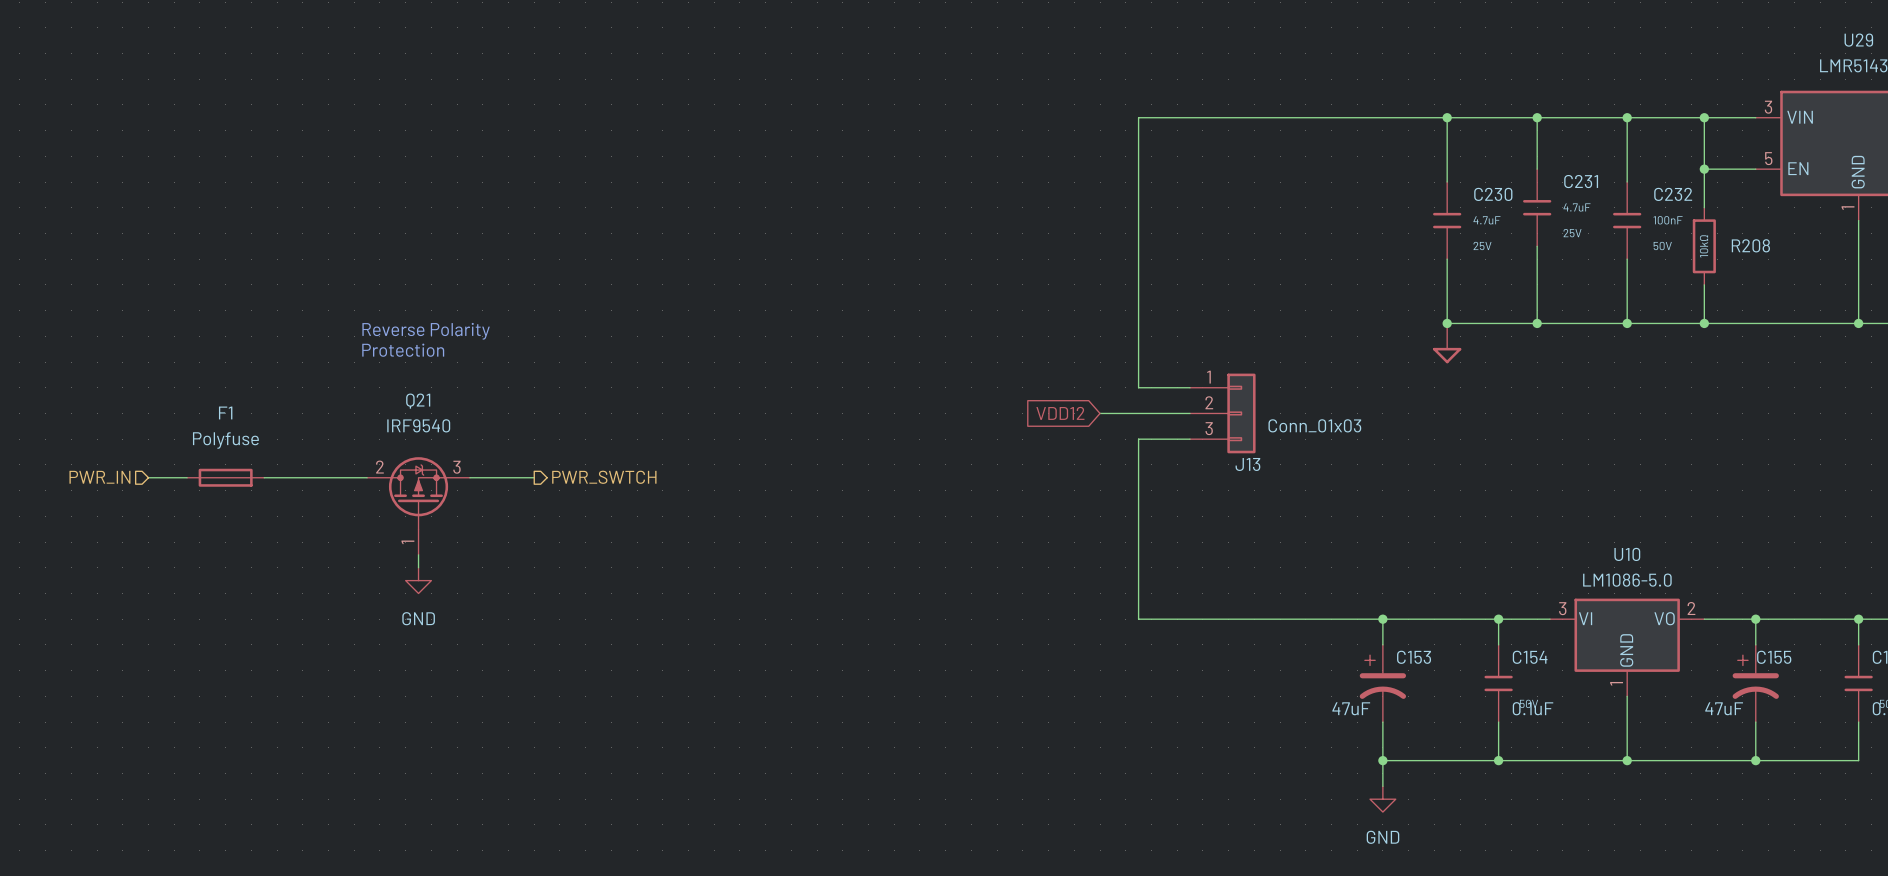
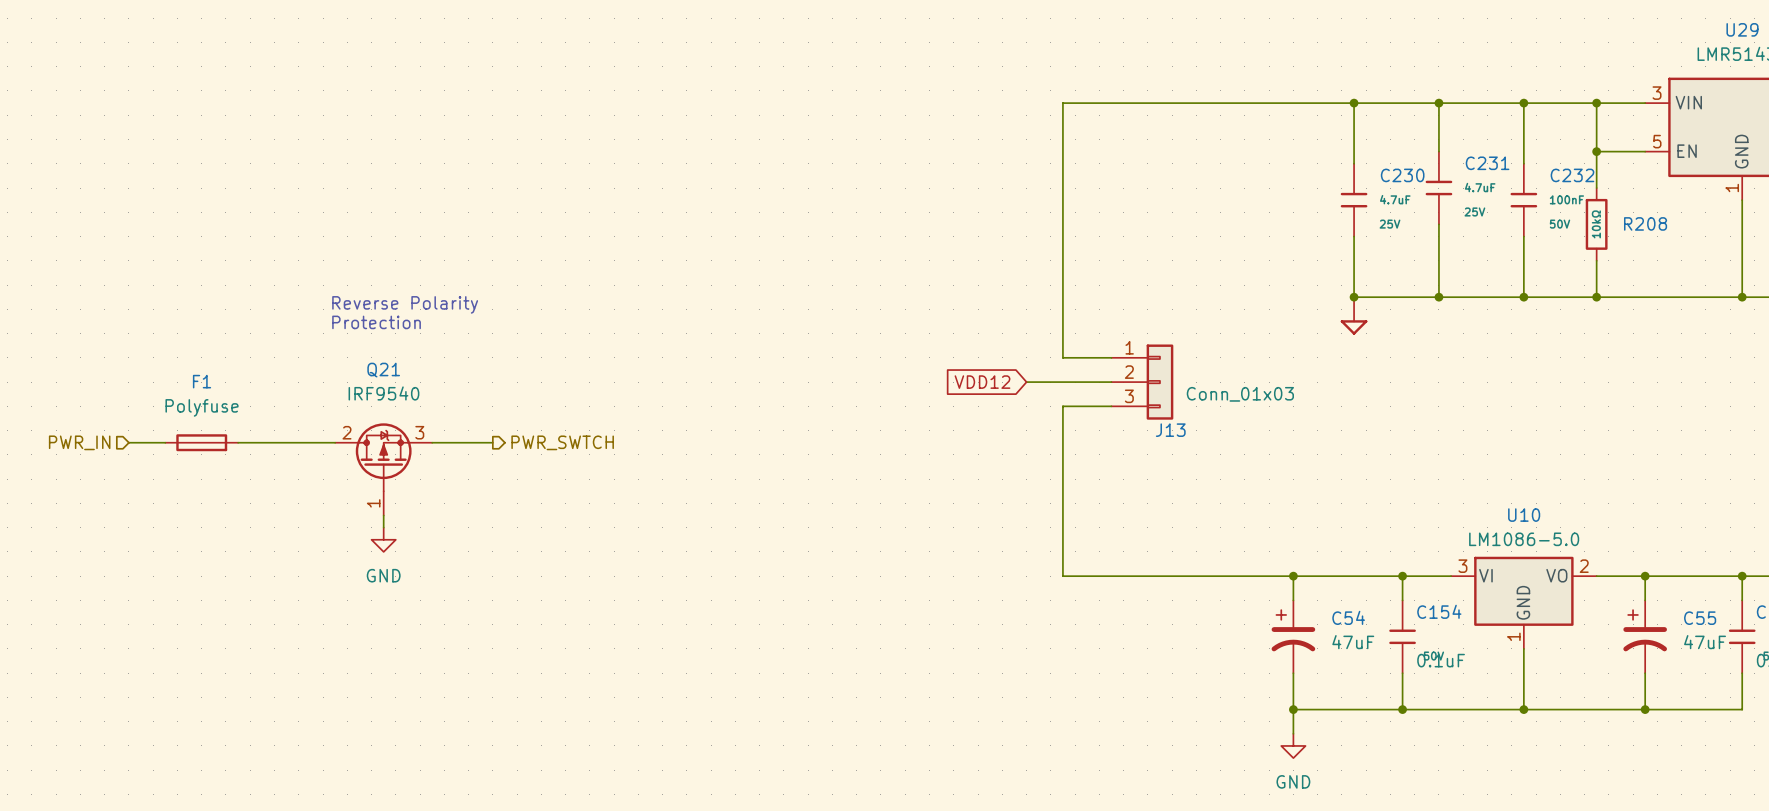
C153 name: C153 (1414, 657) -> C54 (1348, 617)
C155 name: C155 (1774, 657) -> C55 (1700, 618)
C153 value position: 47uF (1351, 708) -> 47uF (1353, 642)
C155 value position: 47uF (1724, 708) -> 47uF (1705, 642)

